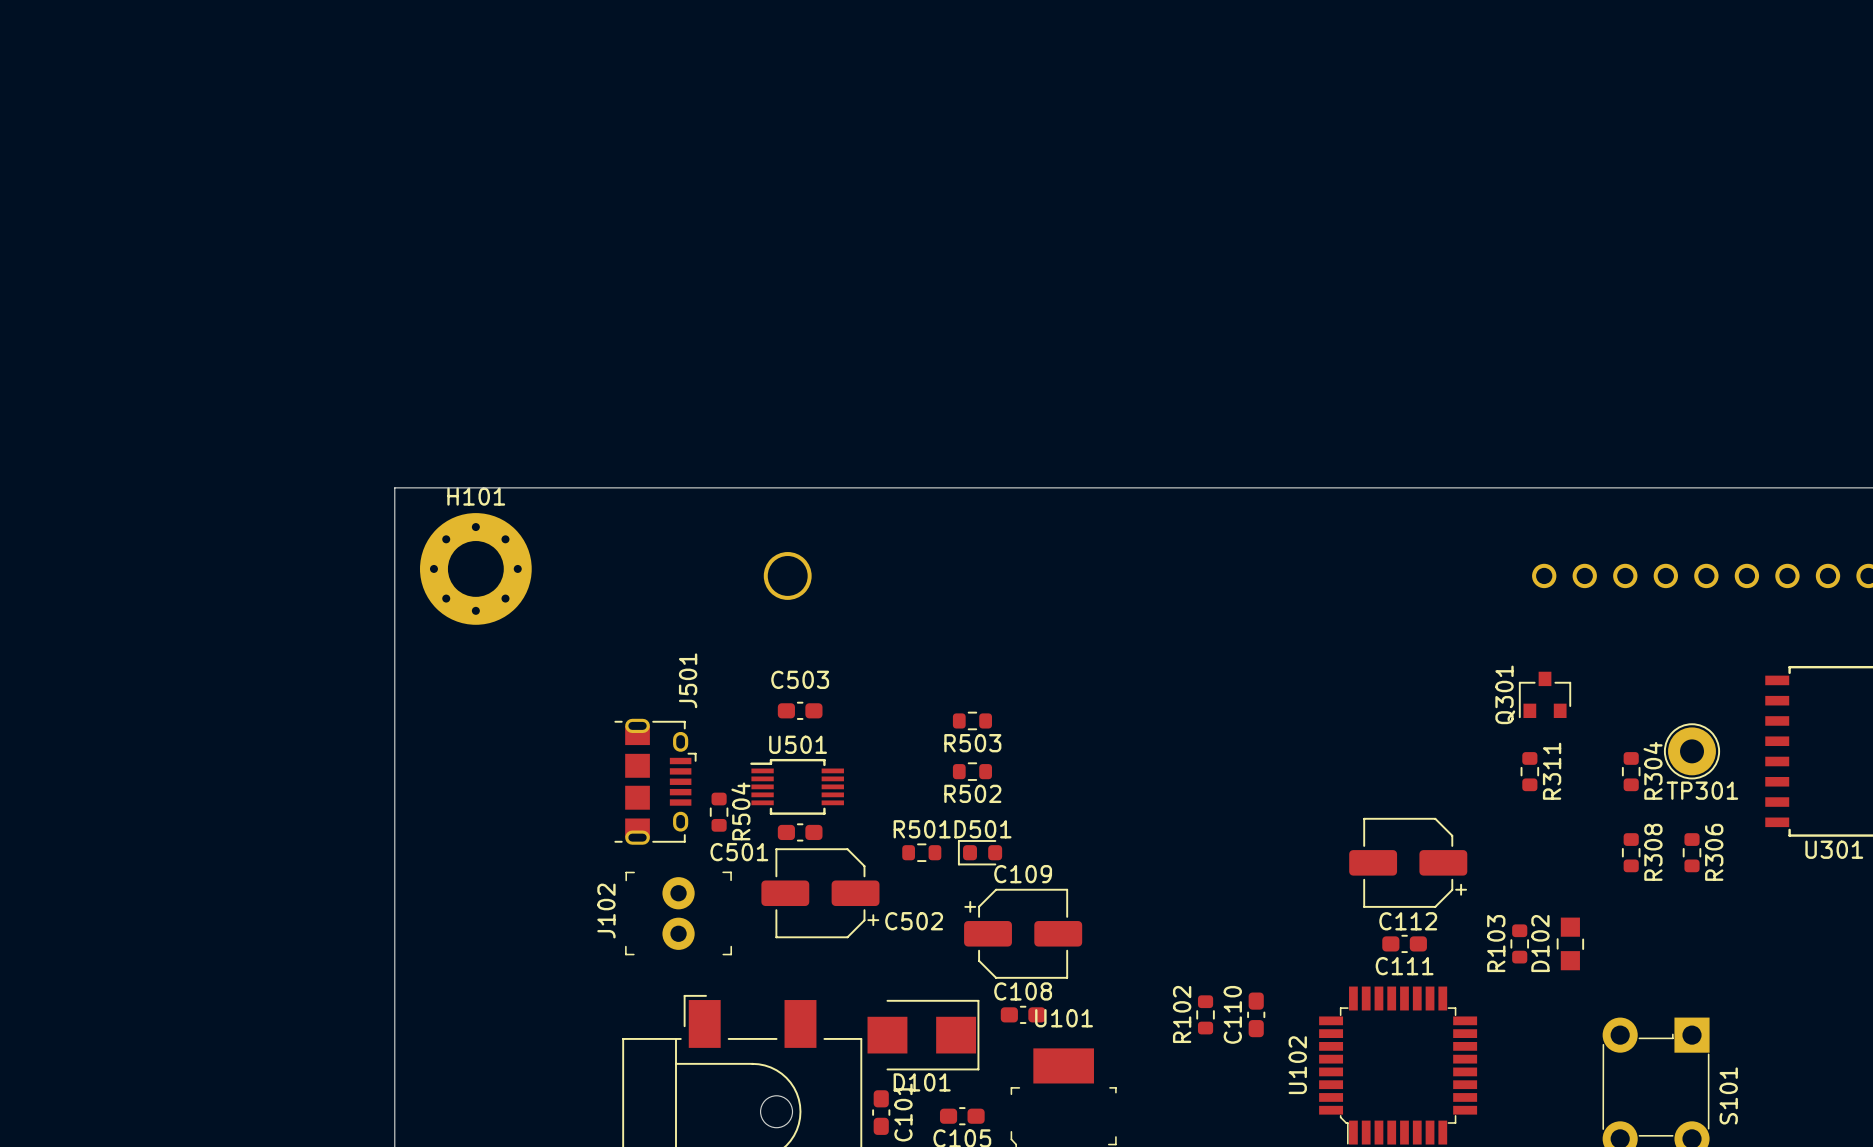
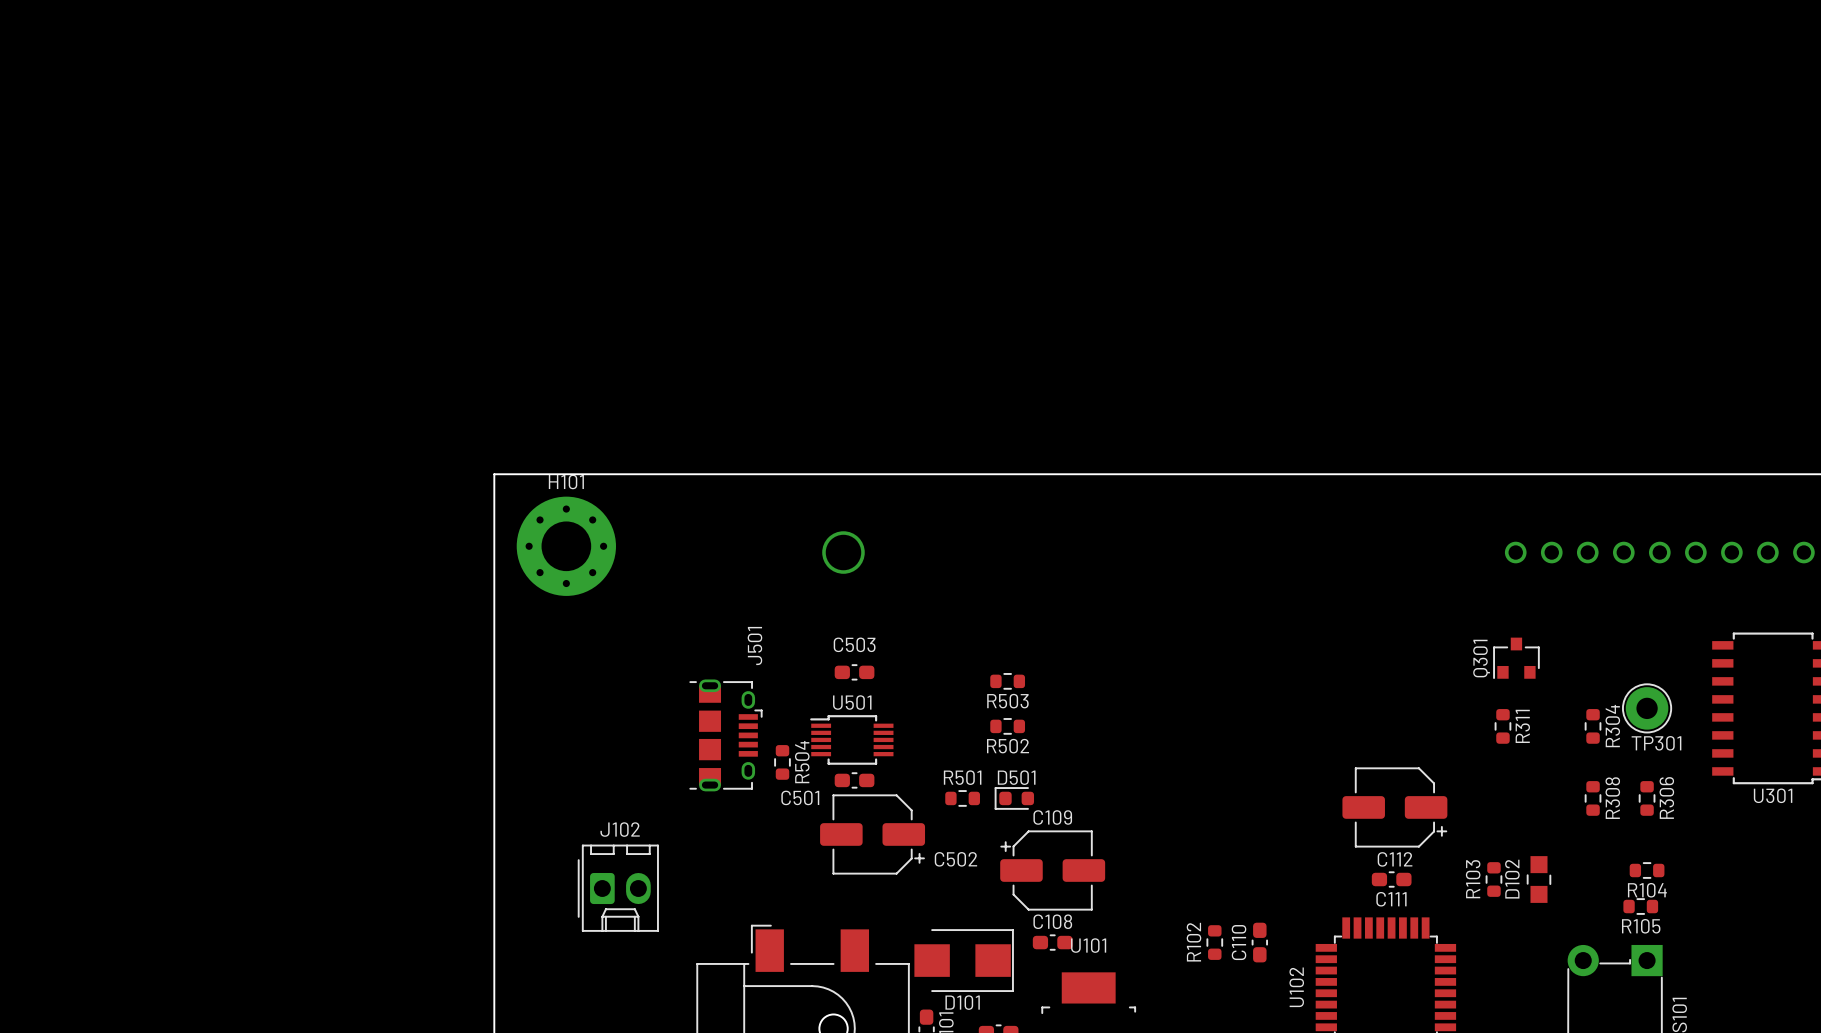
J102 footprint: [625, 871, 733, 956] -> [577, 844, 659, 932]
J102 name position: J102 (606, 911) -> J102 (620, 829)
R104: none -> (1647, 870)
R105: none -> (1640, 906)

